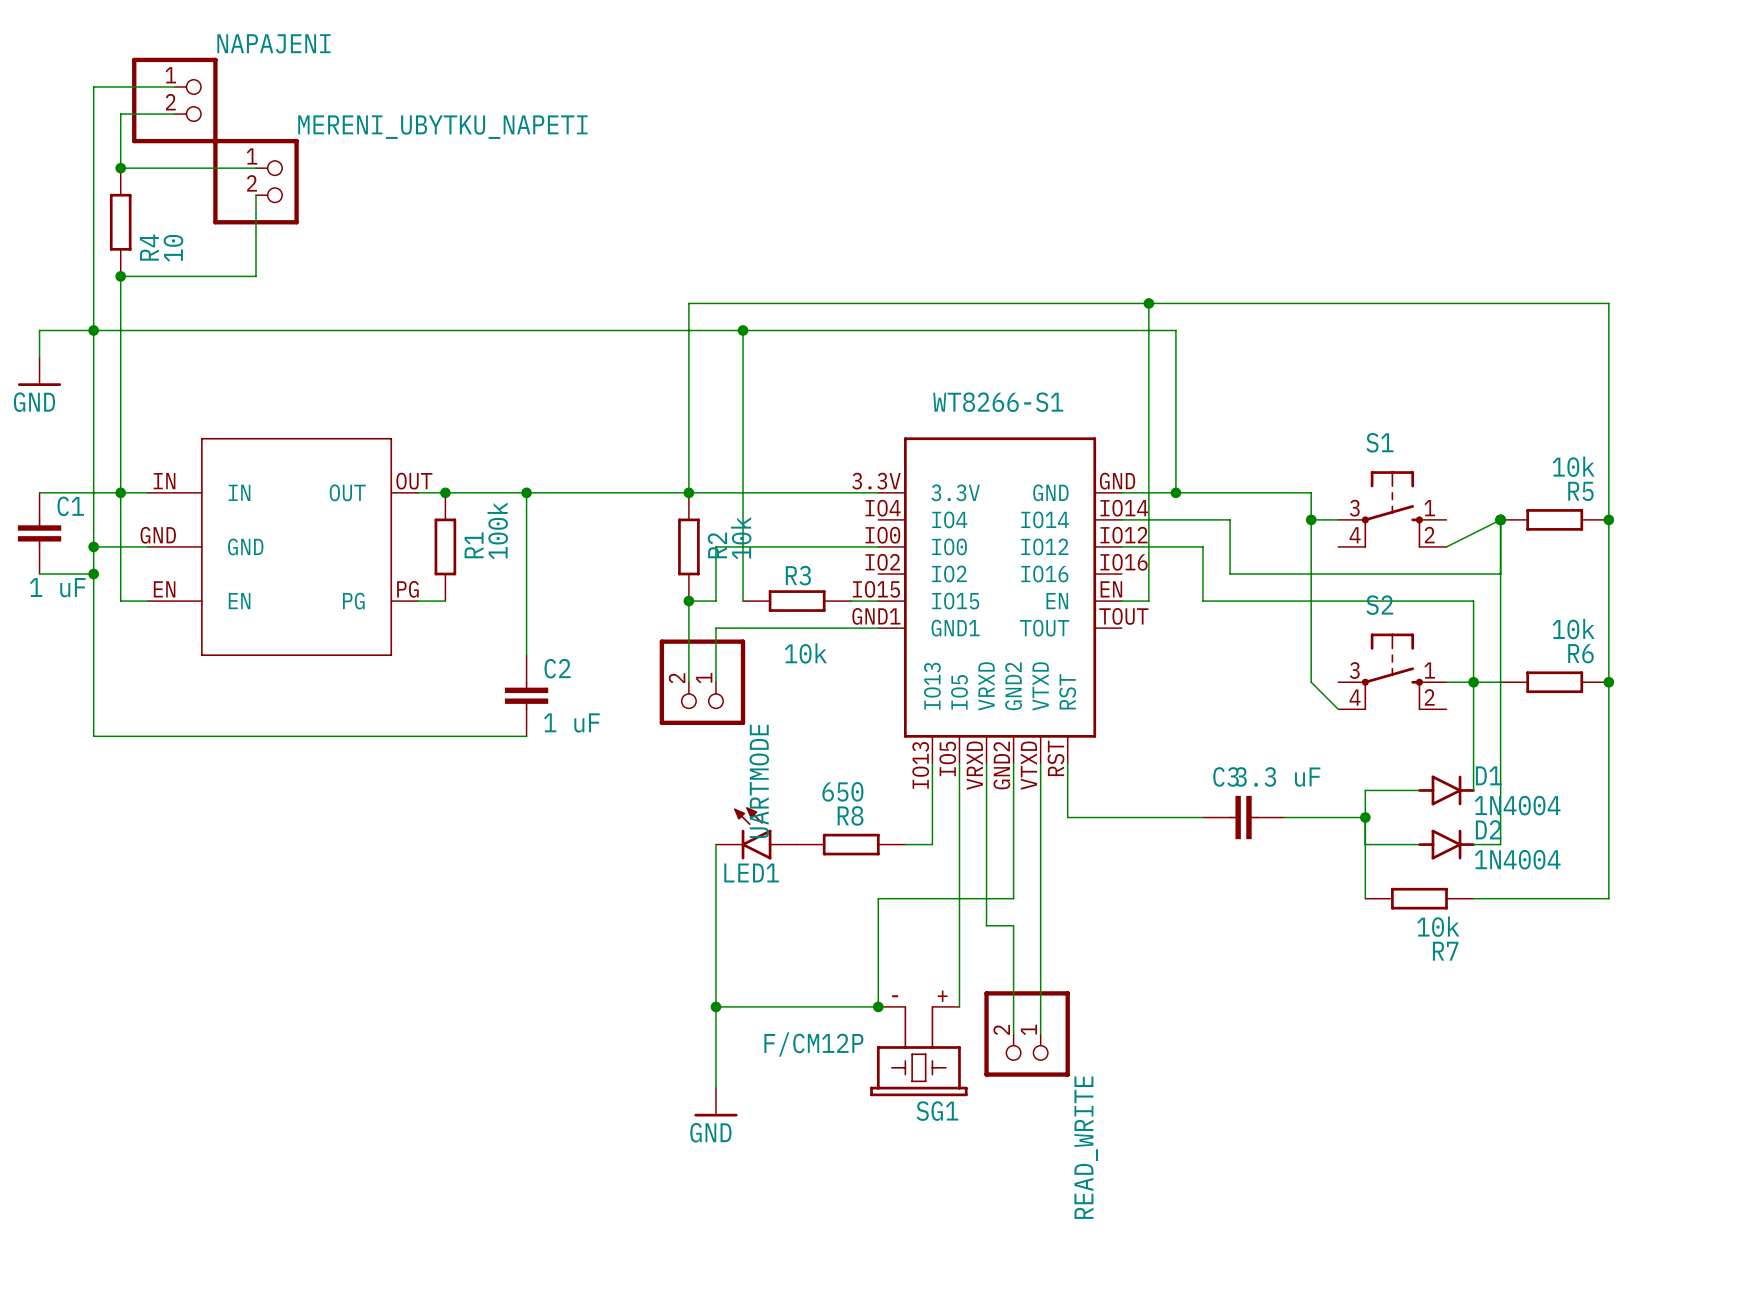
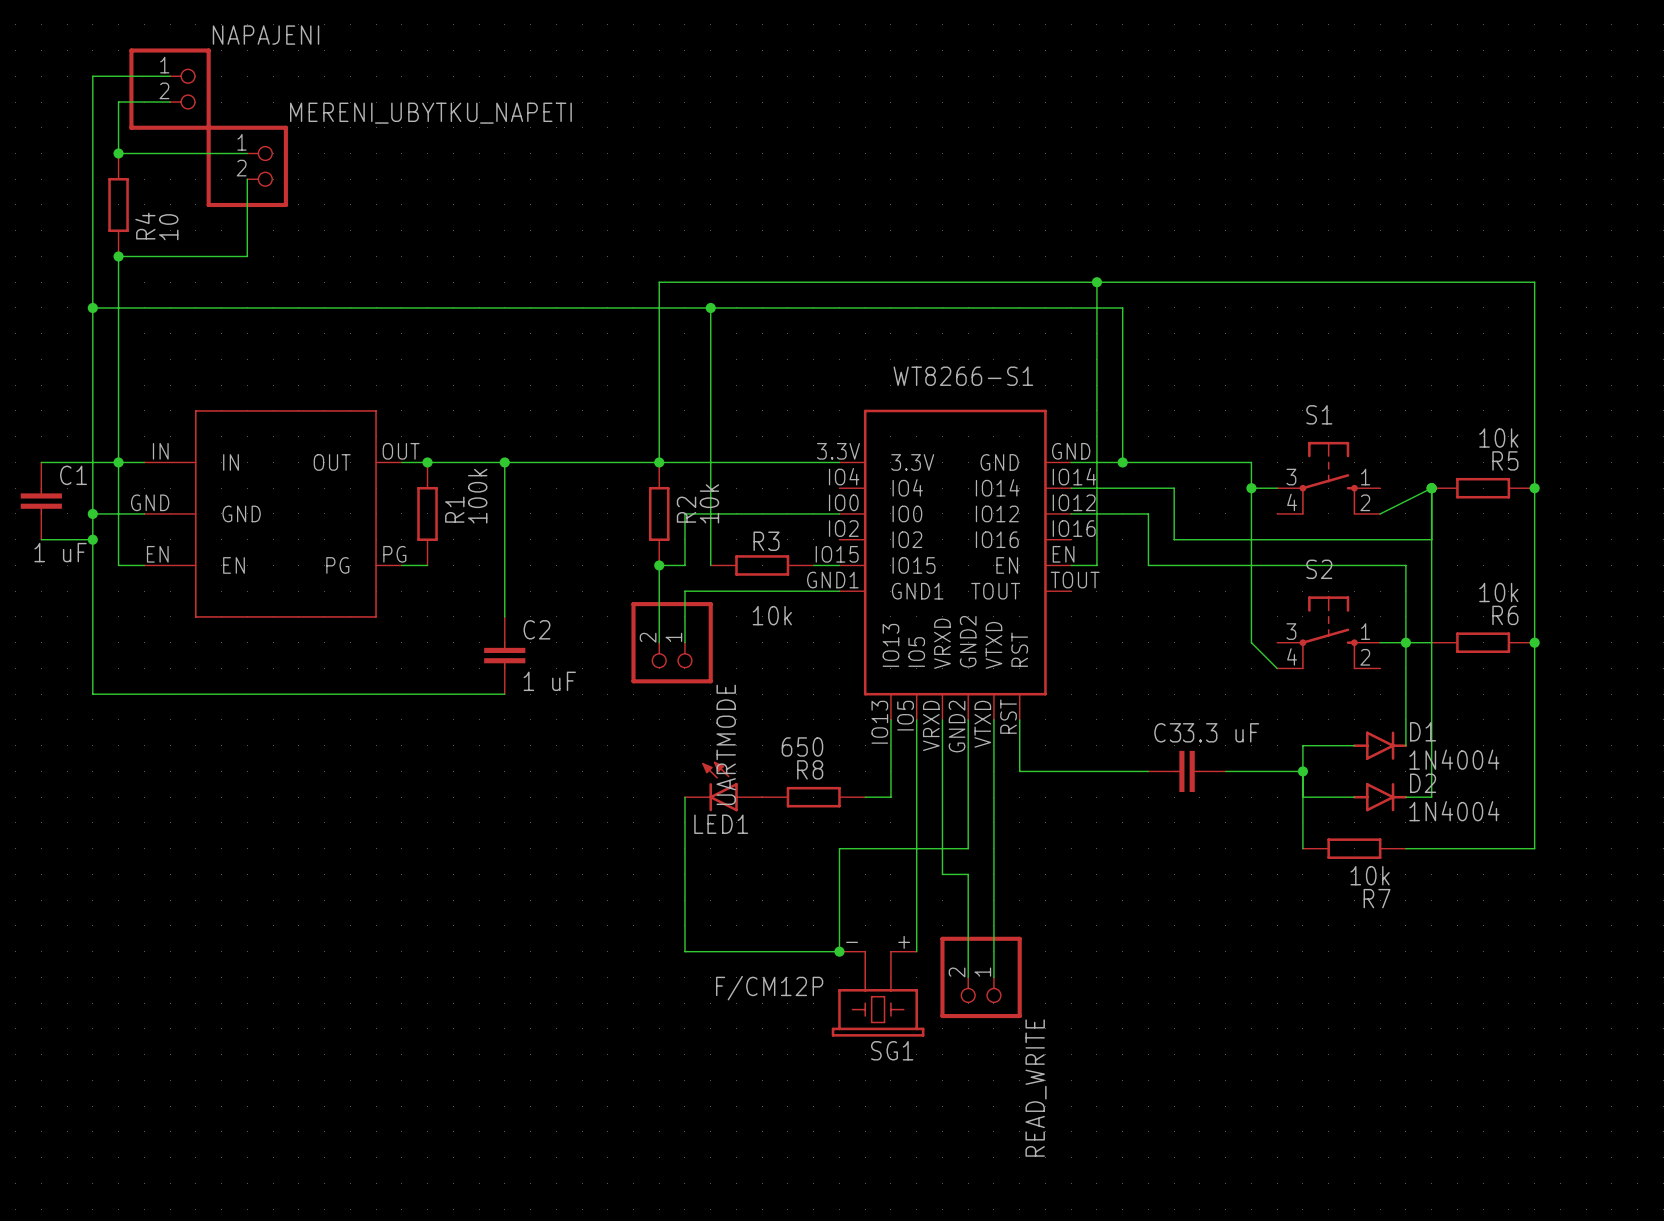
wire: (93, 330) (39, 330) (39, 357) -> none
power symbol: GND (39, 371) -> none
wire: (715, 1006) (715, 1088) -> none
junction: (715, 1006) -> none
power symbol: GND (715, 1102) -> none

